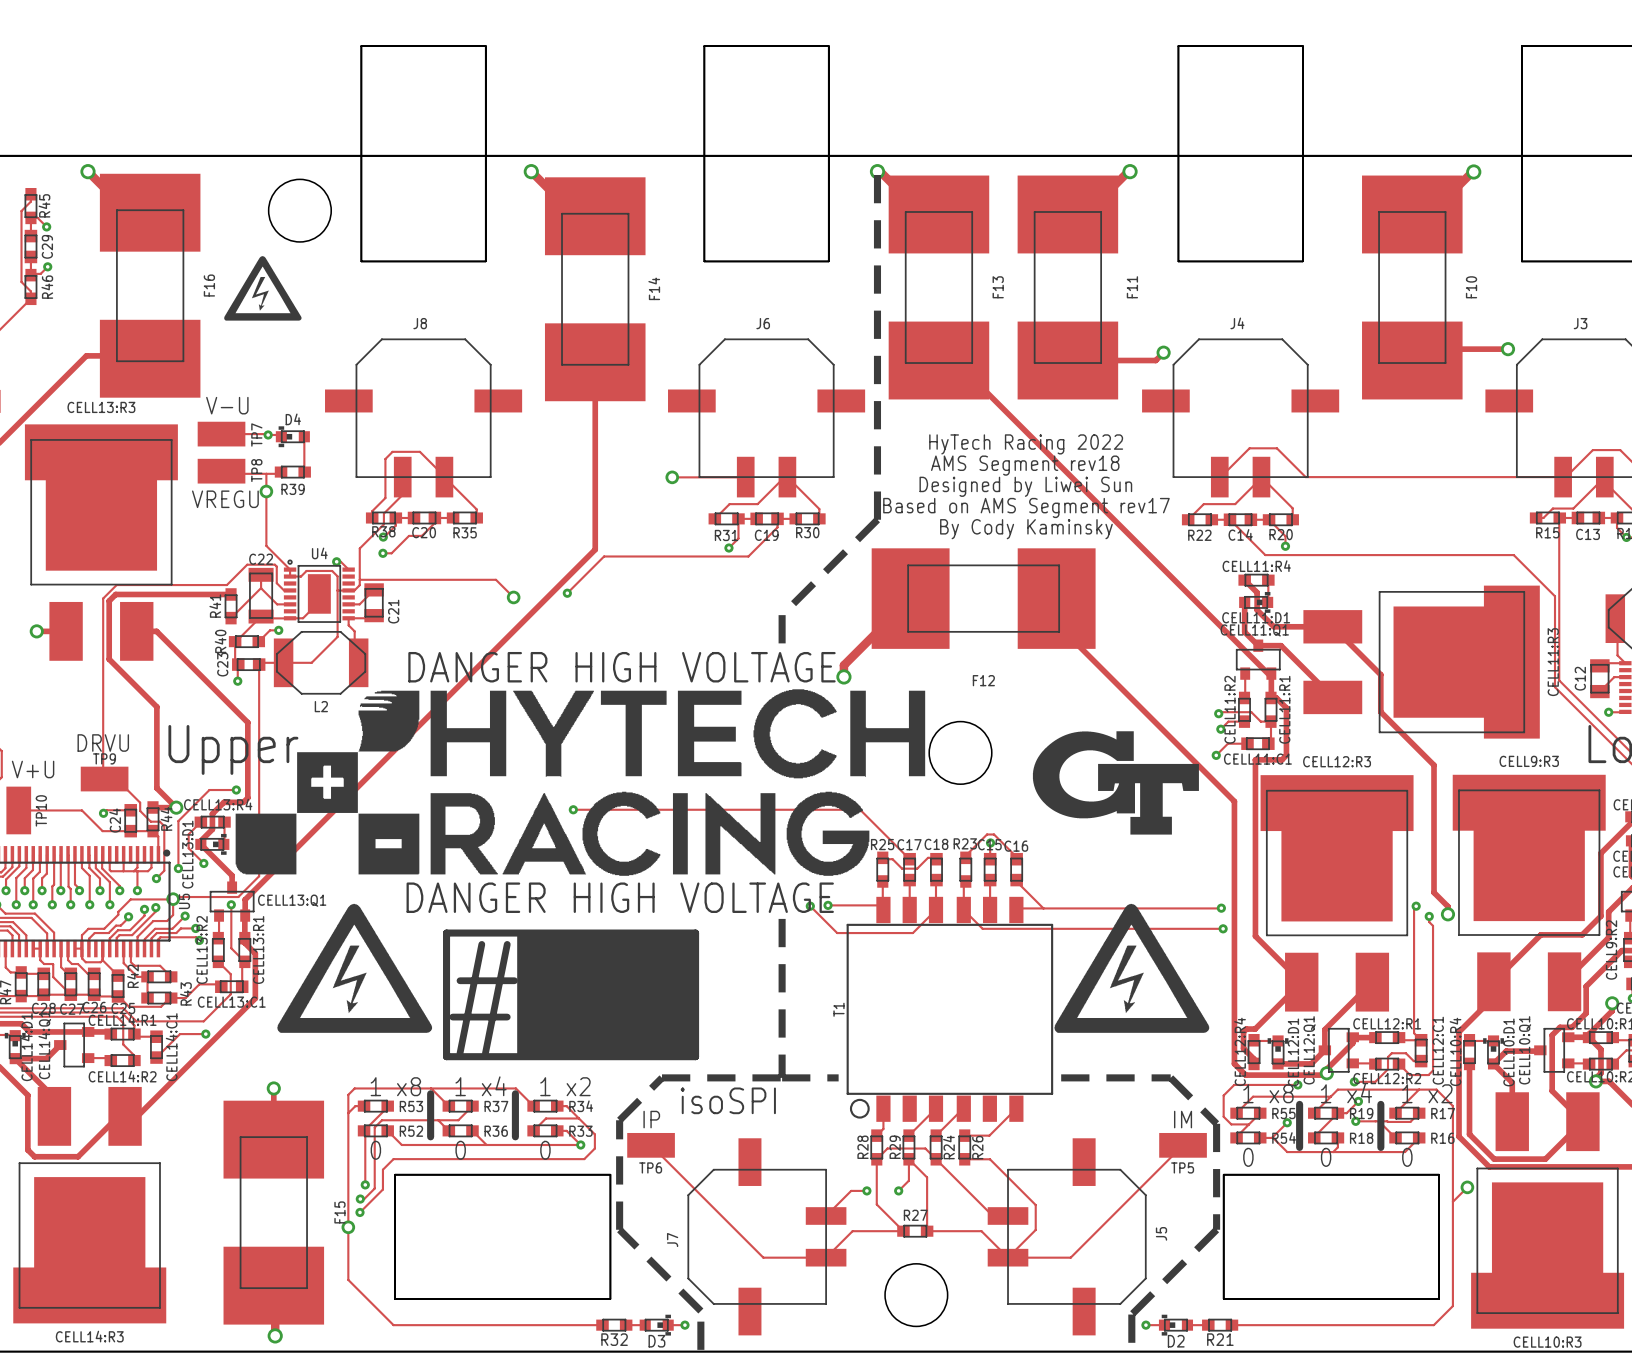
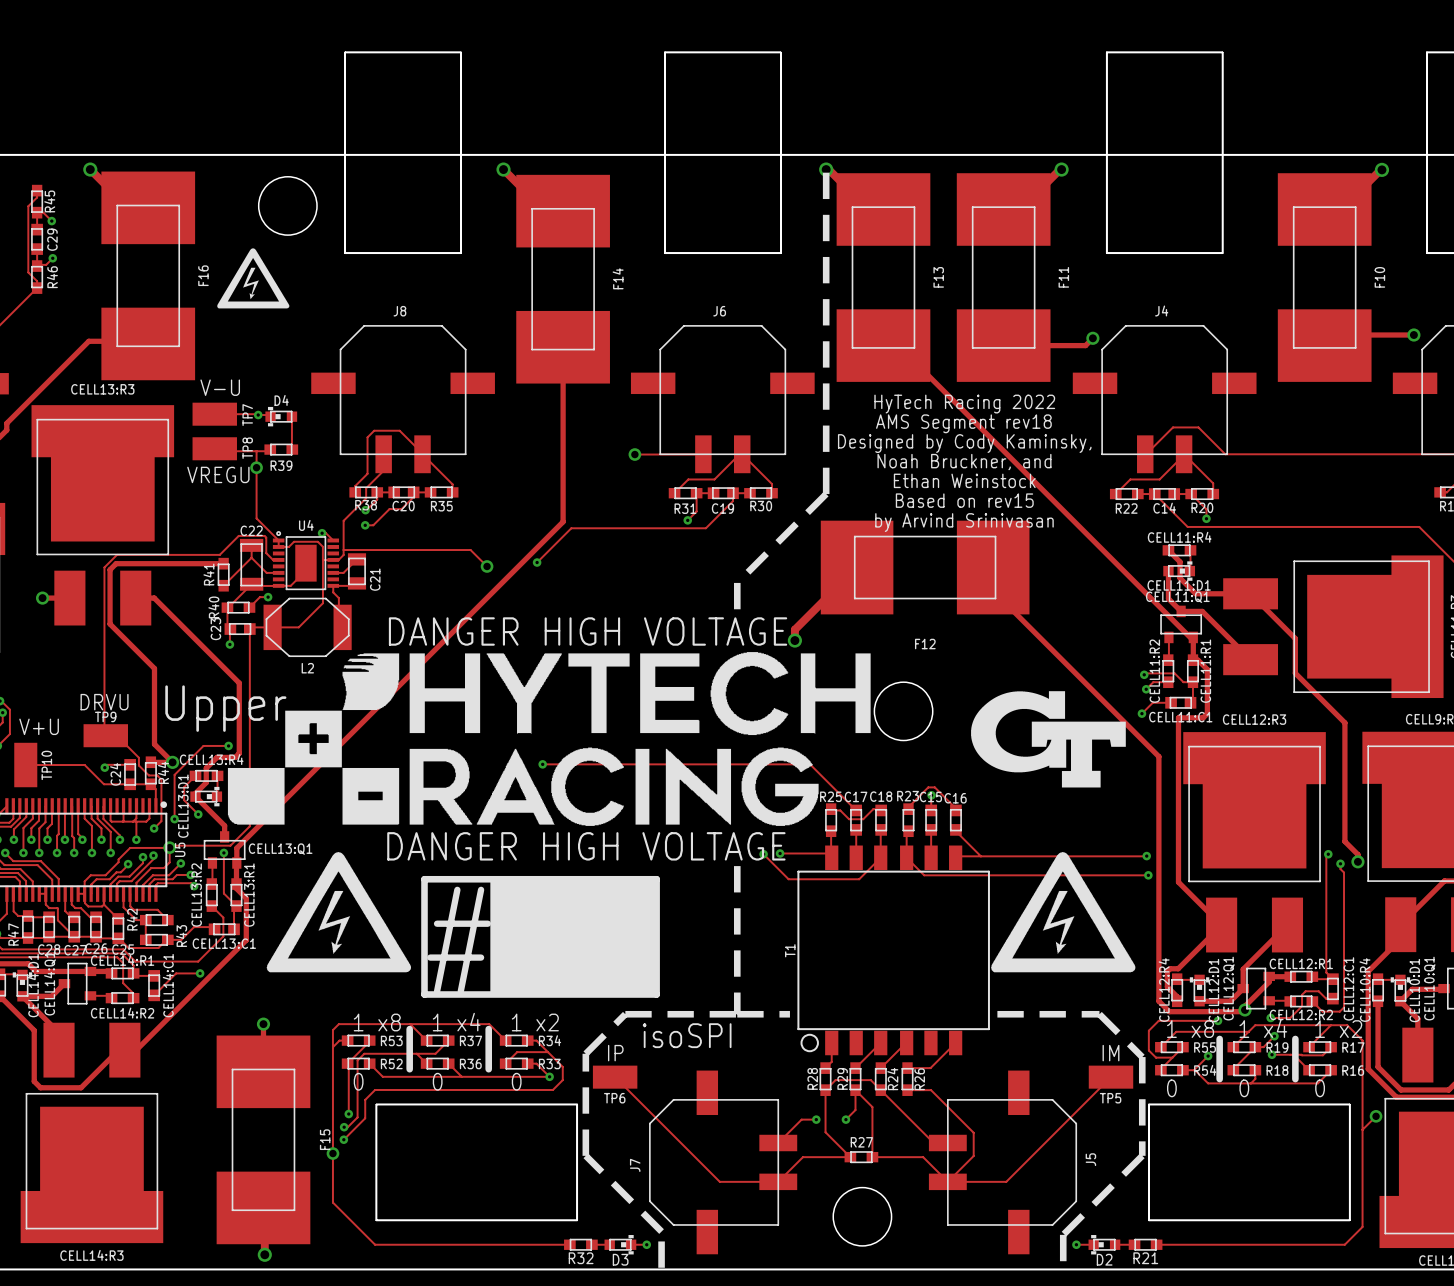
text: none -> HyTech Racing 2022 (964, 404)
text: HyTech Racing 2022 (1026, 444) -> AMS Segment rev18 (963, 423)
text: AMS Segment rev18 (1025, 465) -> Designed by Cody Kaminsky, (964, 443)
text: Designed by Liwei Sun (1025, 486) -> Noah Bruckner, and (964, 462)
text: Based on AMS Segment rev17 (1026, 507) -> Ethan Weinstock (964, 480)
text: By Cody Kaminsky (1026, 529) -> Based on rev15 (964, 500)
text: none -> by Arvind Srinivasan (964, 522)

